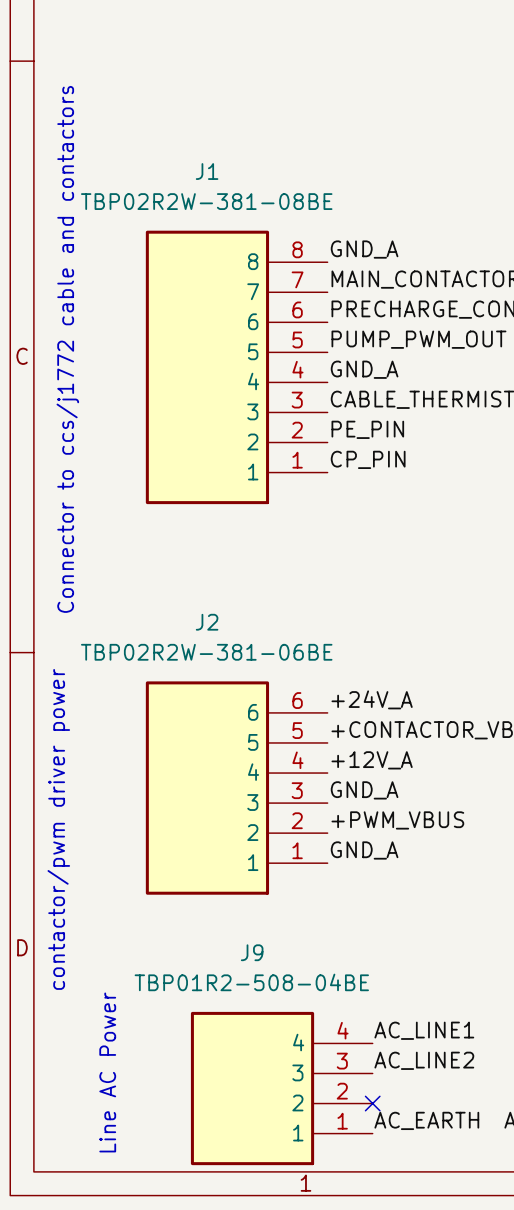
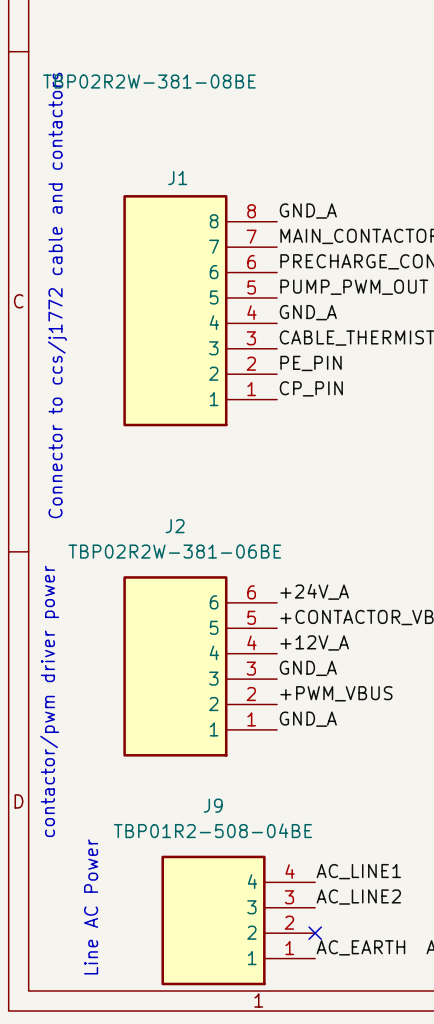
J1 name position: J1 (207, 171) -> J1 (177, 178)
J1 value position: TBP02R2W-381-08BE (206, 201) -> TBP02R2W-381-08BE (149, 81)

